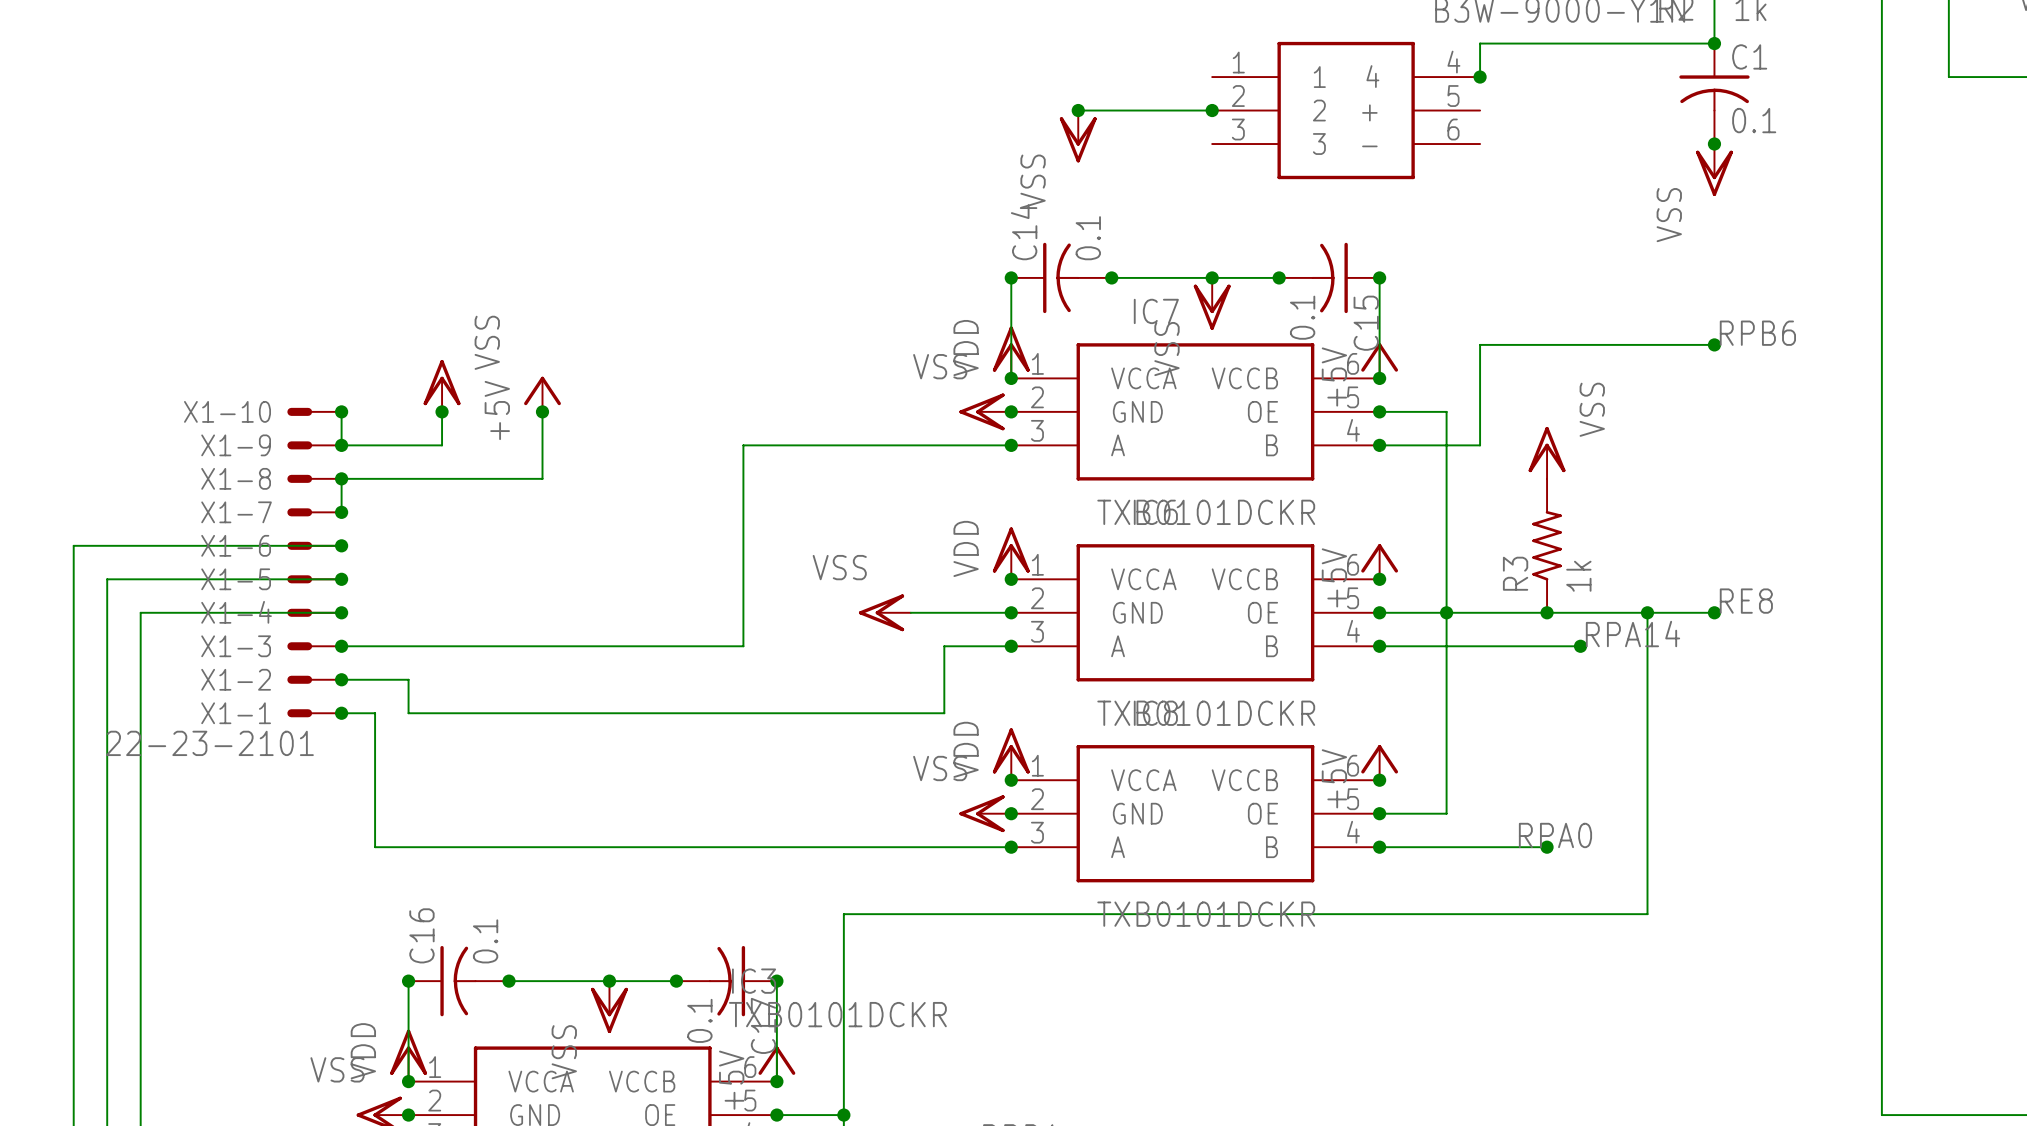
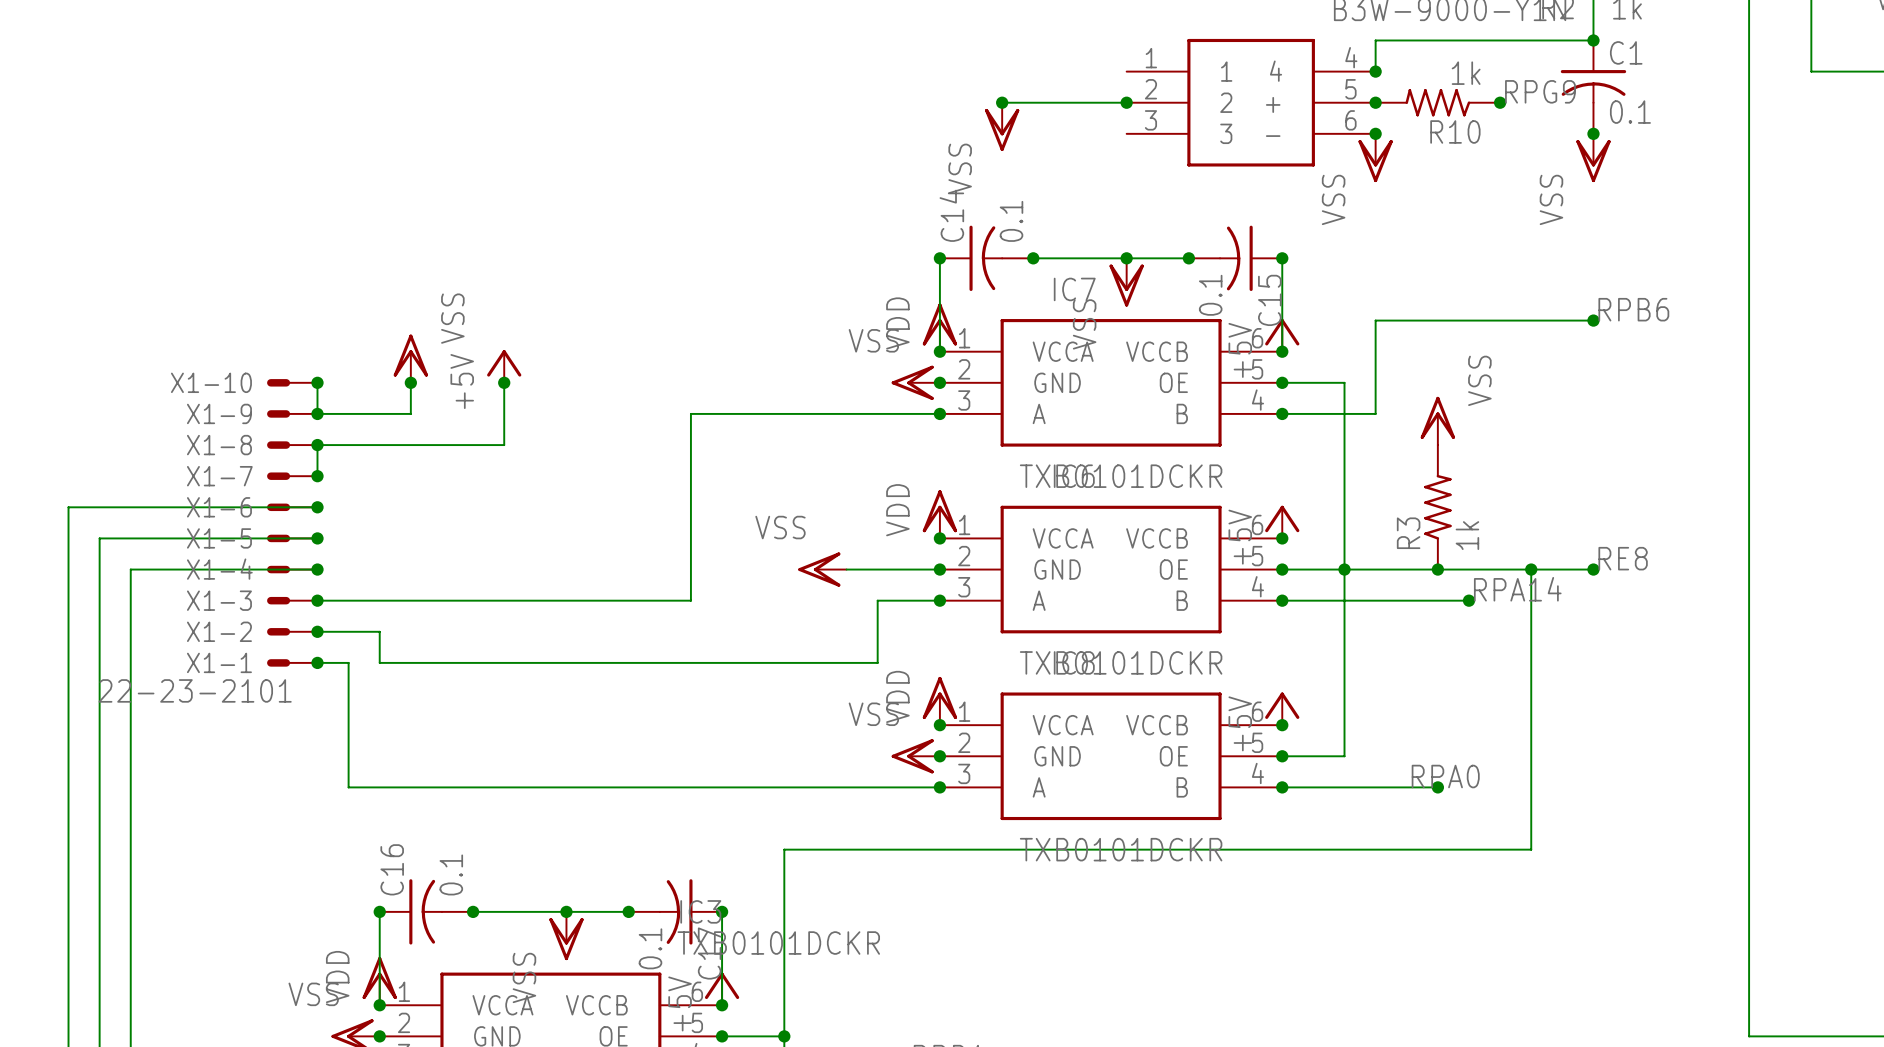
label: none -> RPG9 (1540, 91)
junction: none -> (1375, 102)
R10: none -> 1k (1437, 102)
junction: none -> (1500, 102)
junction: none -> (1375, 133)
power symbol: none -> VSS (1375, 157)

